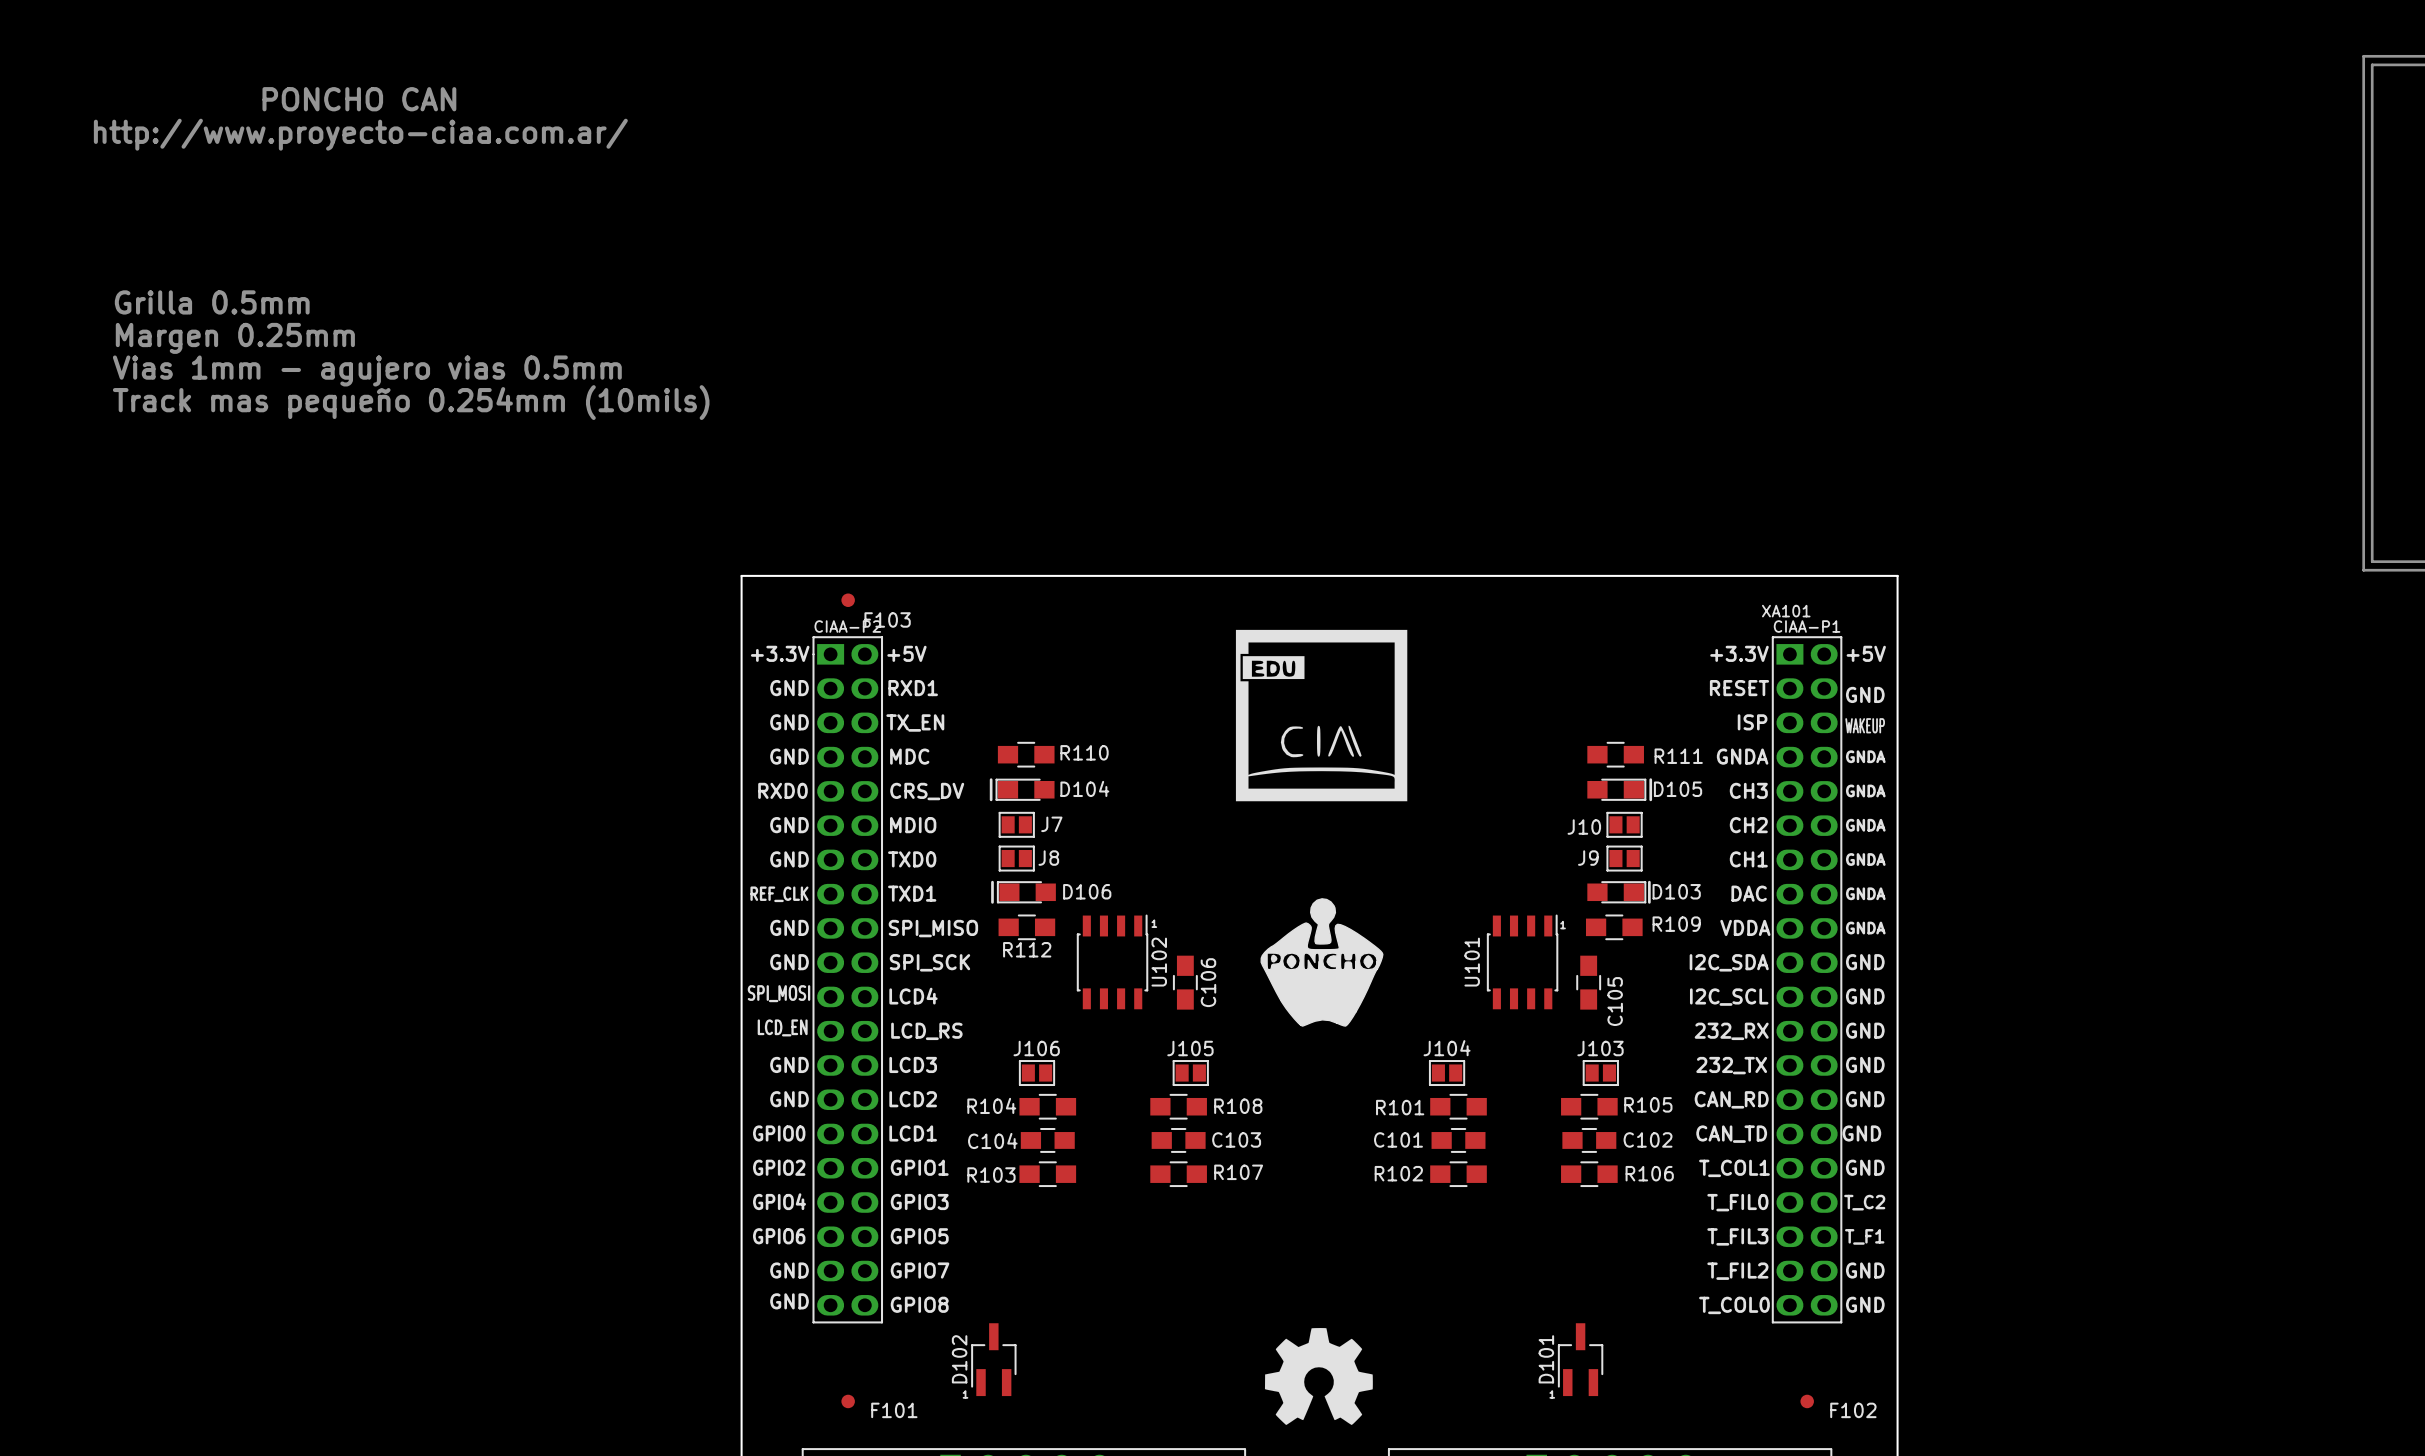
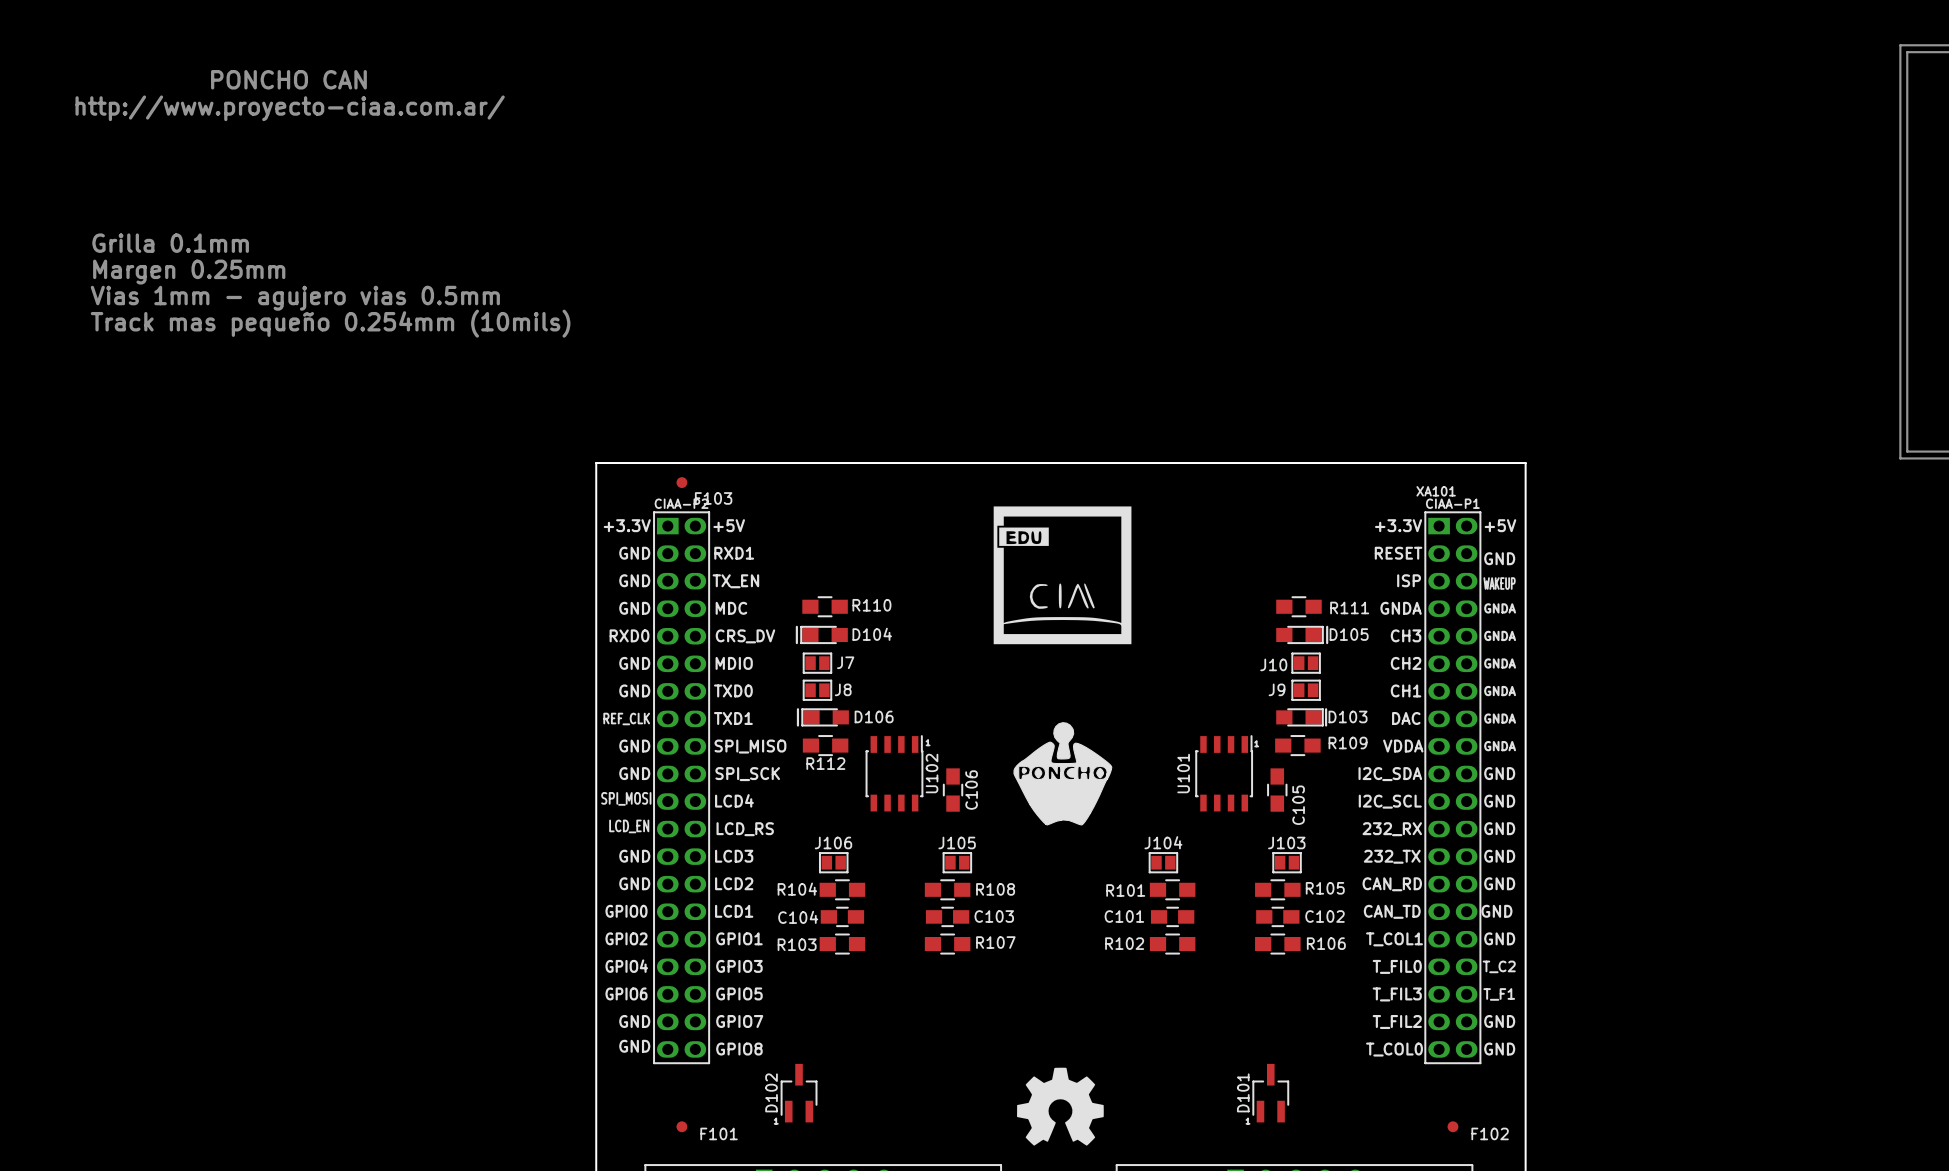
text: Grilla 0.5mm (212, 302) -> Grilla 0.1mm (170, 243)

